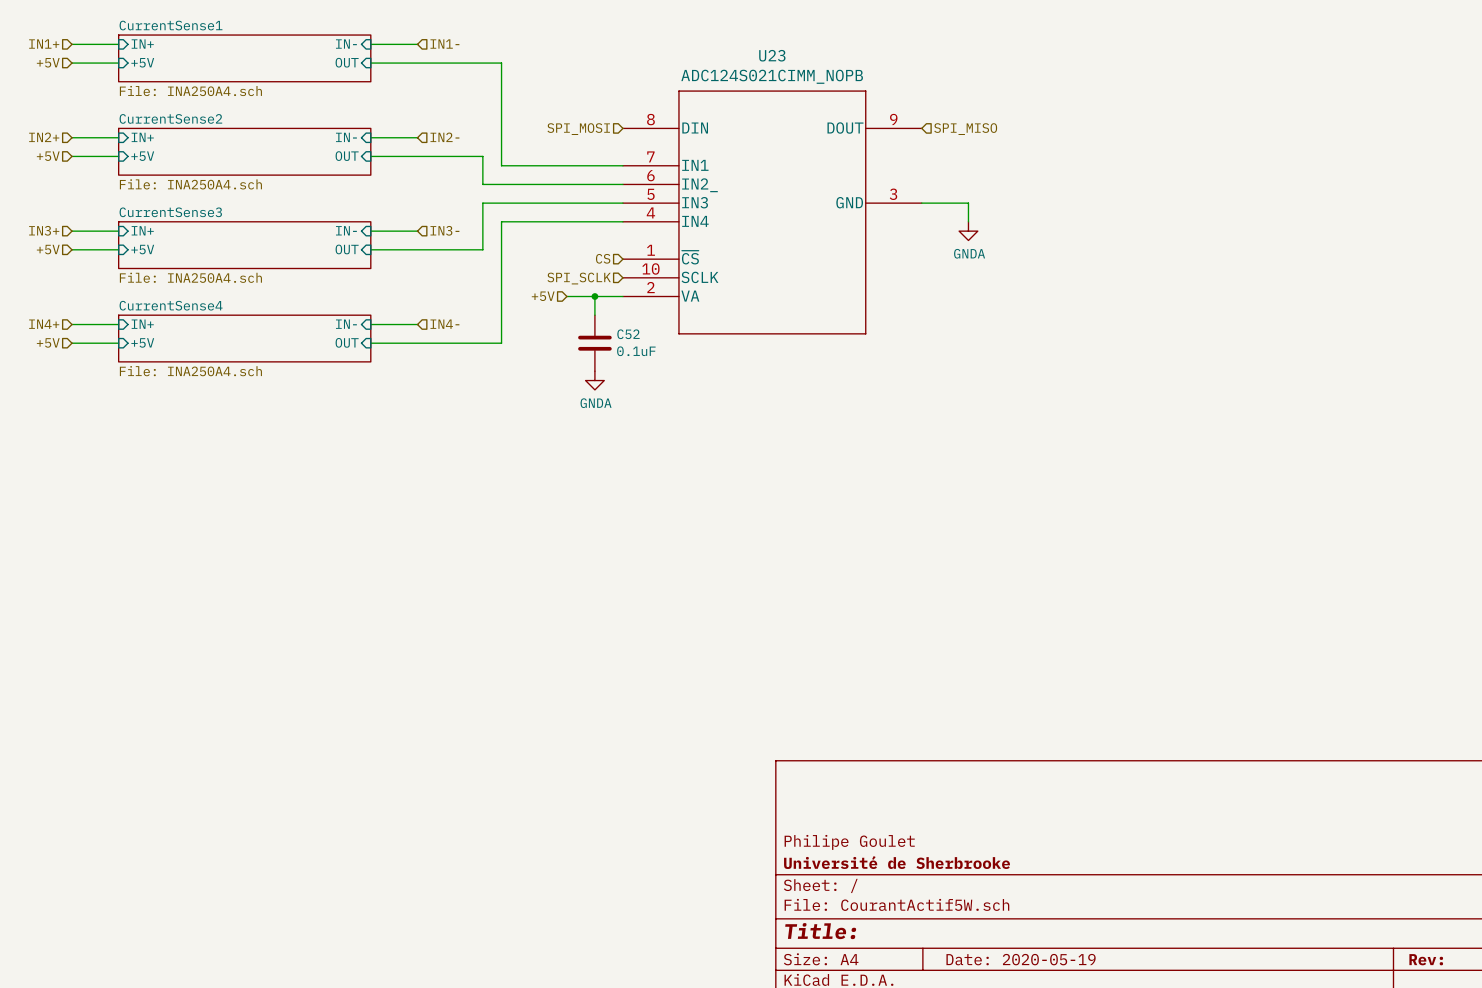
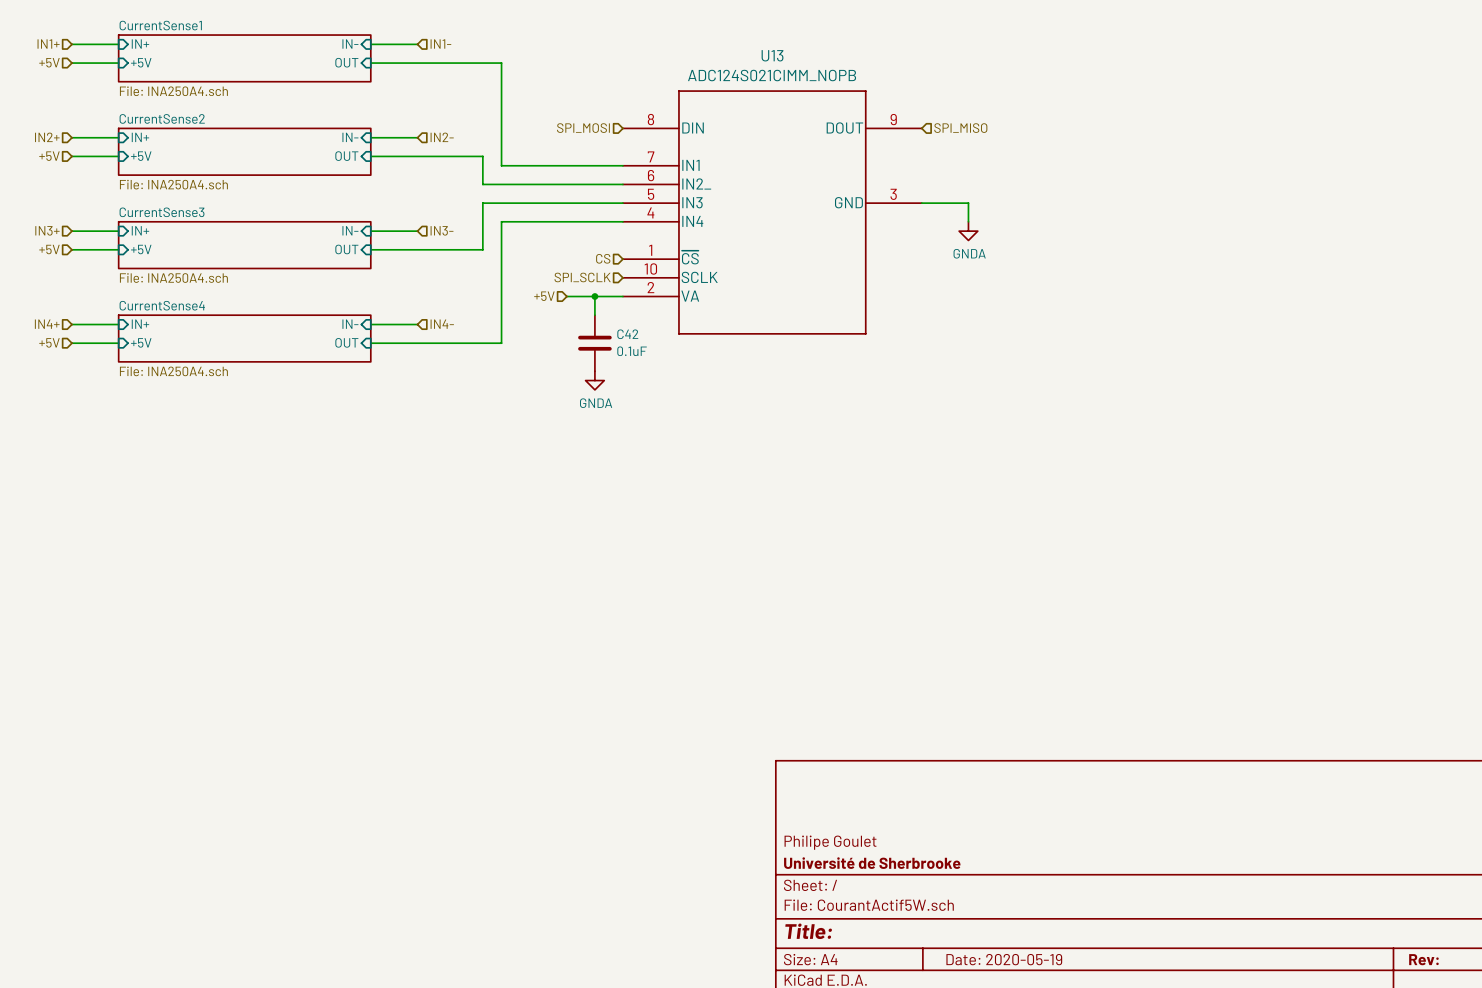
U23 name: U23 (772, 55) -> U13 (772, 55)
C52 name: C52 (628, 334) -> C42 (627, 334)

